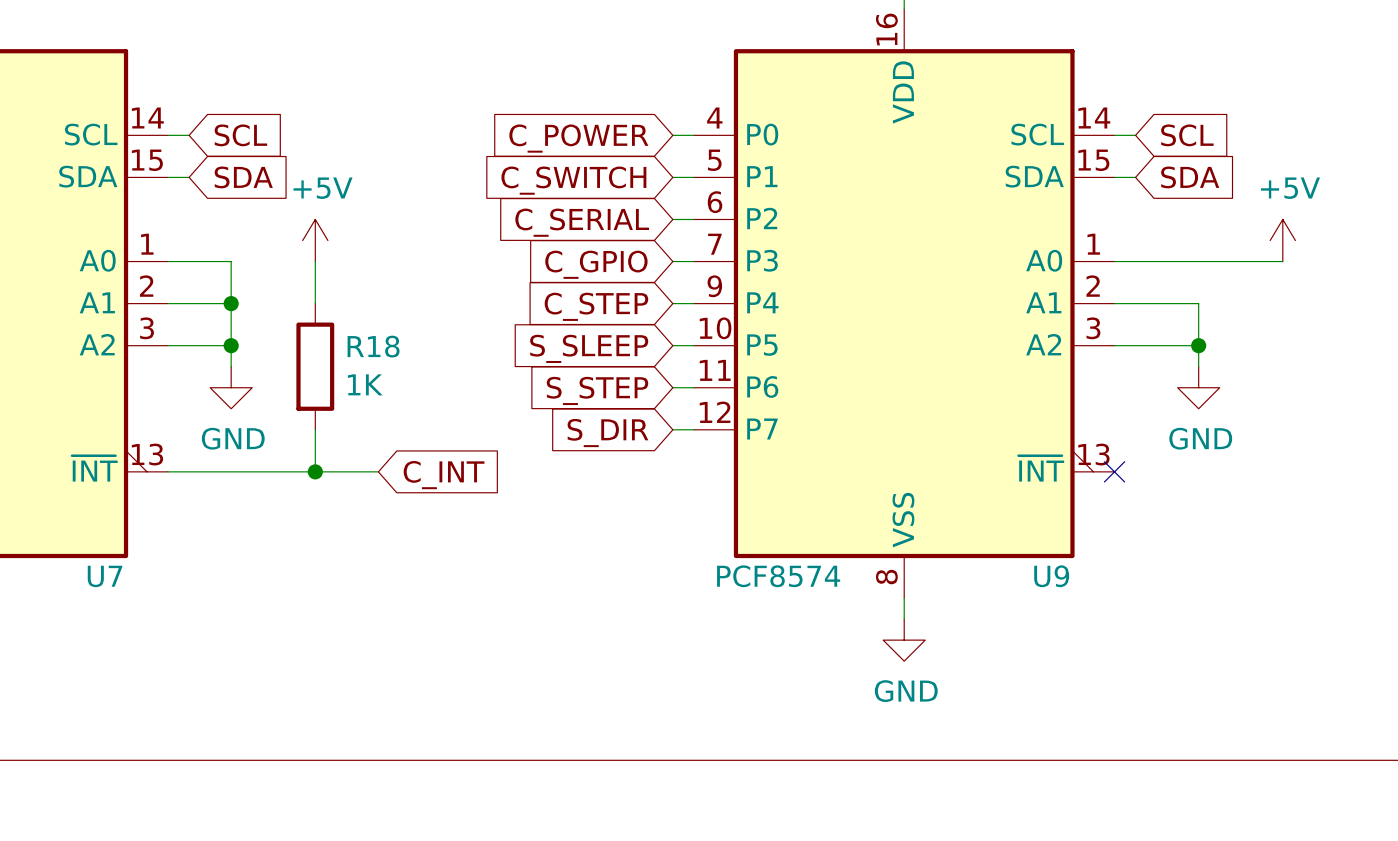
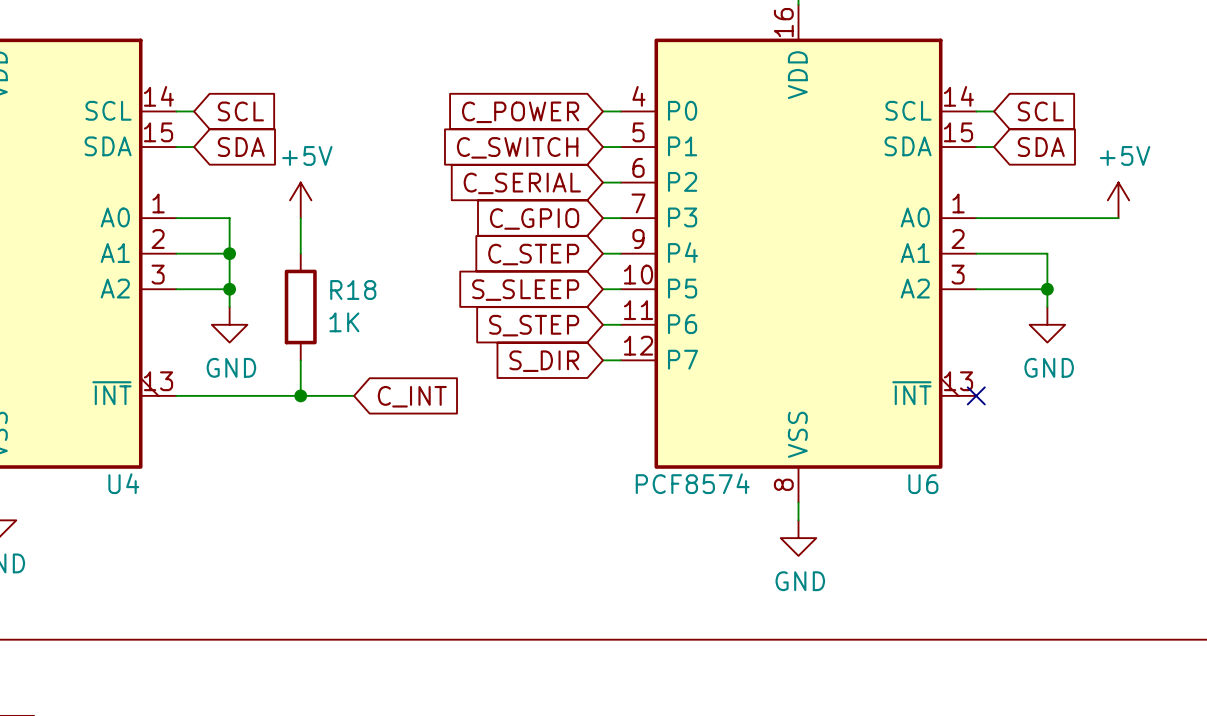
U7 name: U7 (105, 576) -> U4 (123, 483)
U9 name: U9 (1051, 576) -> U6 (923, 484)

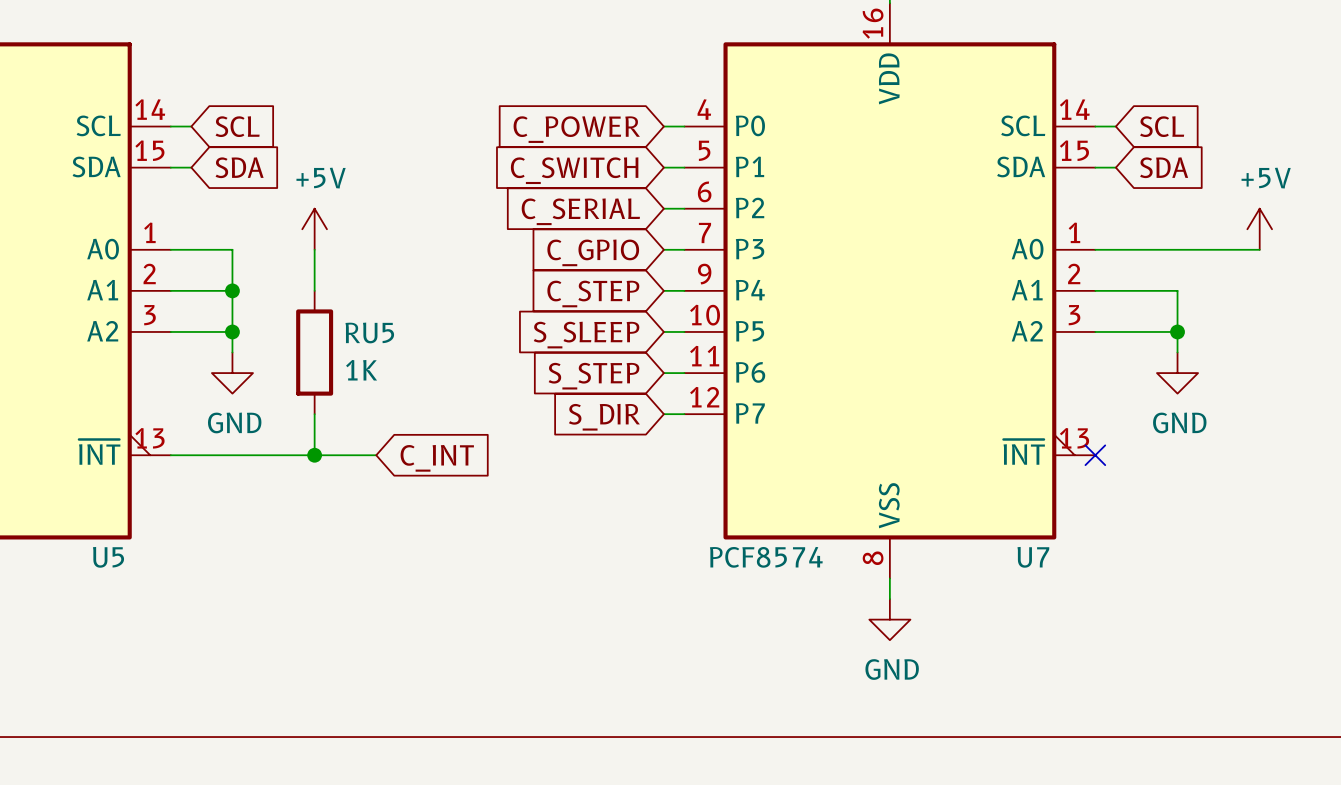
R18 name: R18 (353, 289) -> RU5 (369, 332)
U4 name: U4 (123, 483) -> U5 (108, 557)
U6 name: U6 (923, 484) -> U7 (1033, 557)

